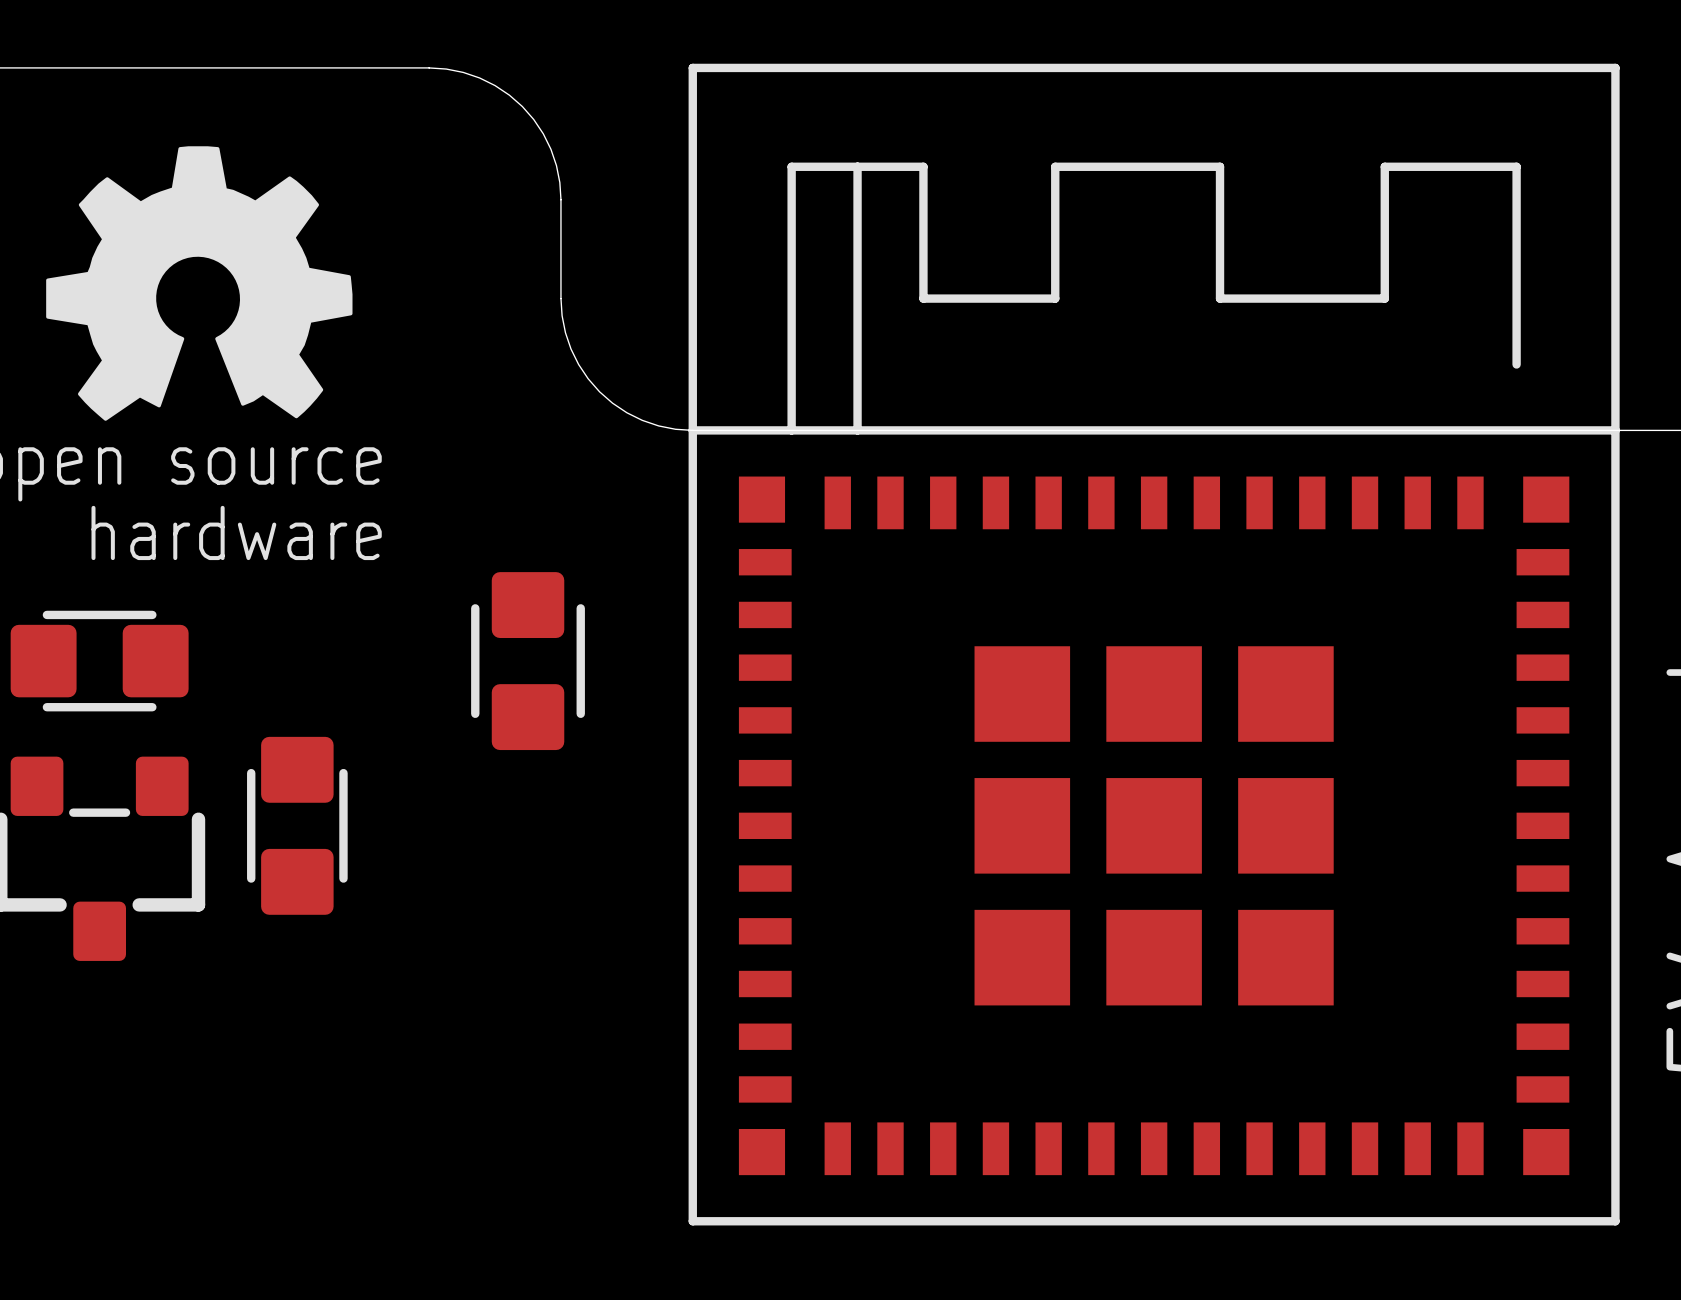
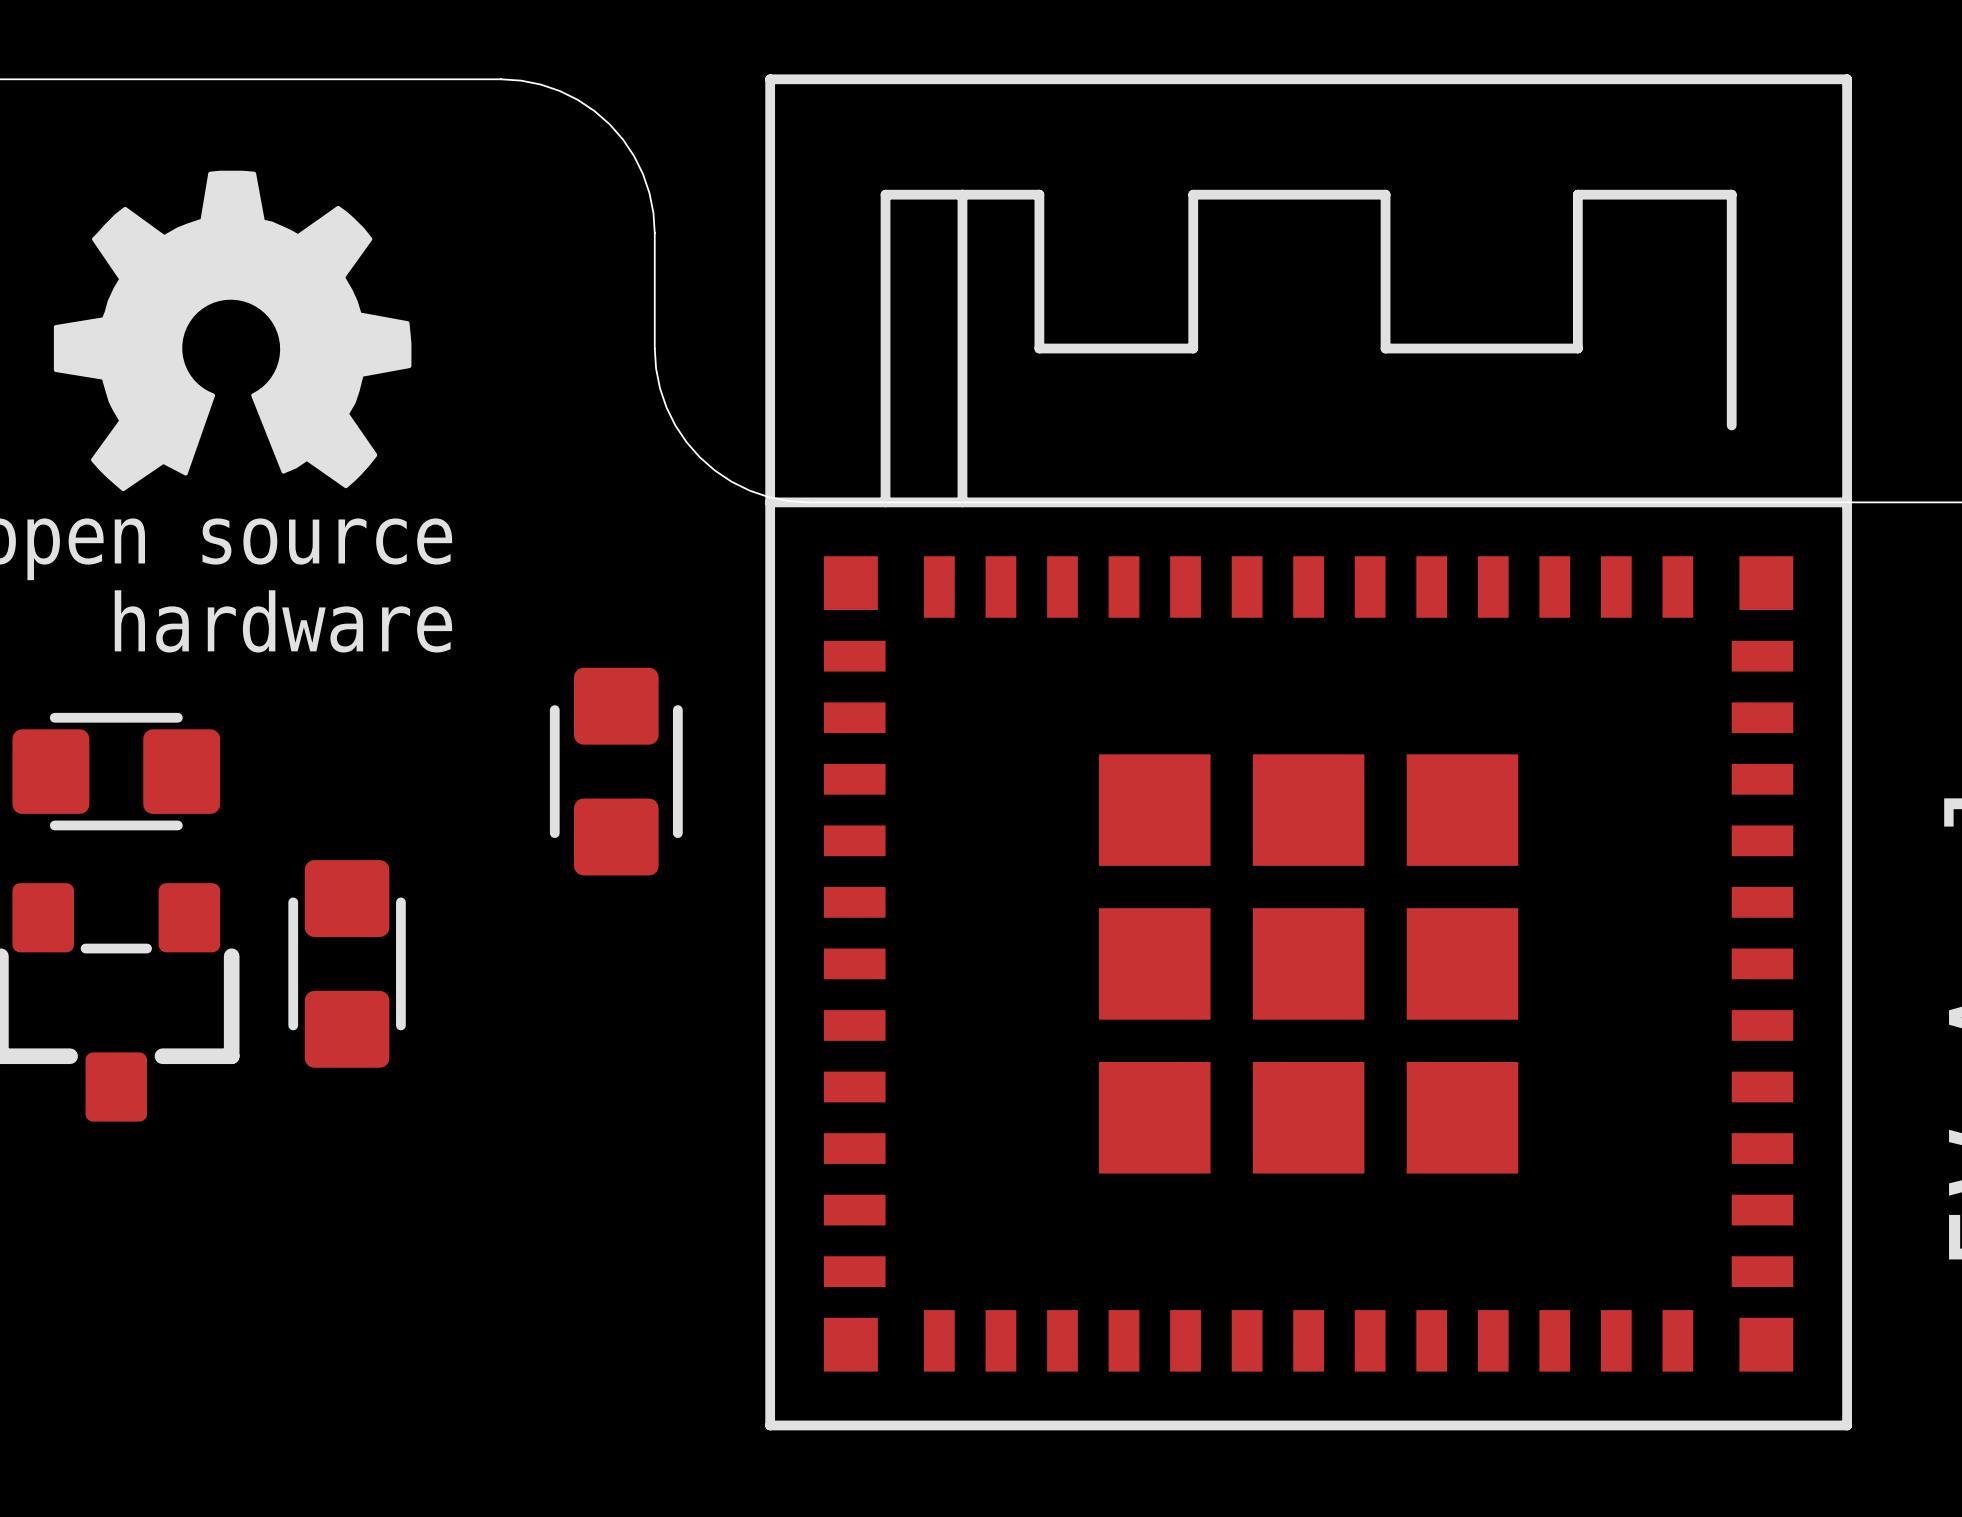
part position: (1154, 644) -> (1308, 752)

